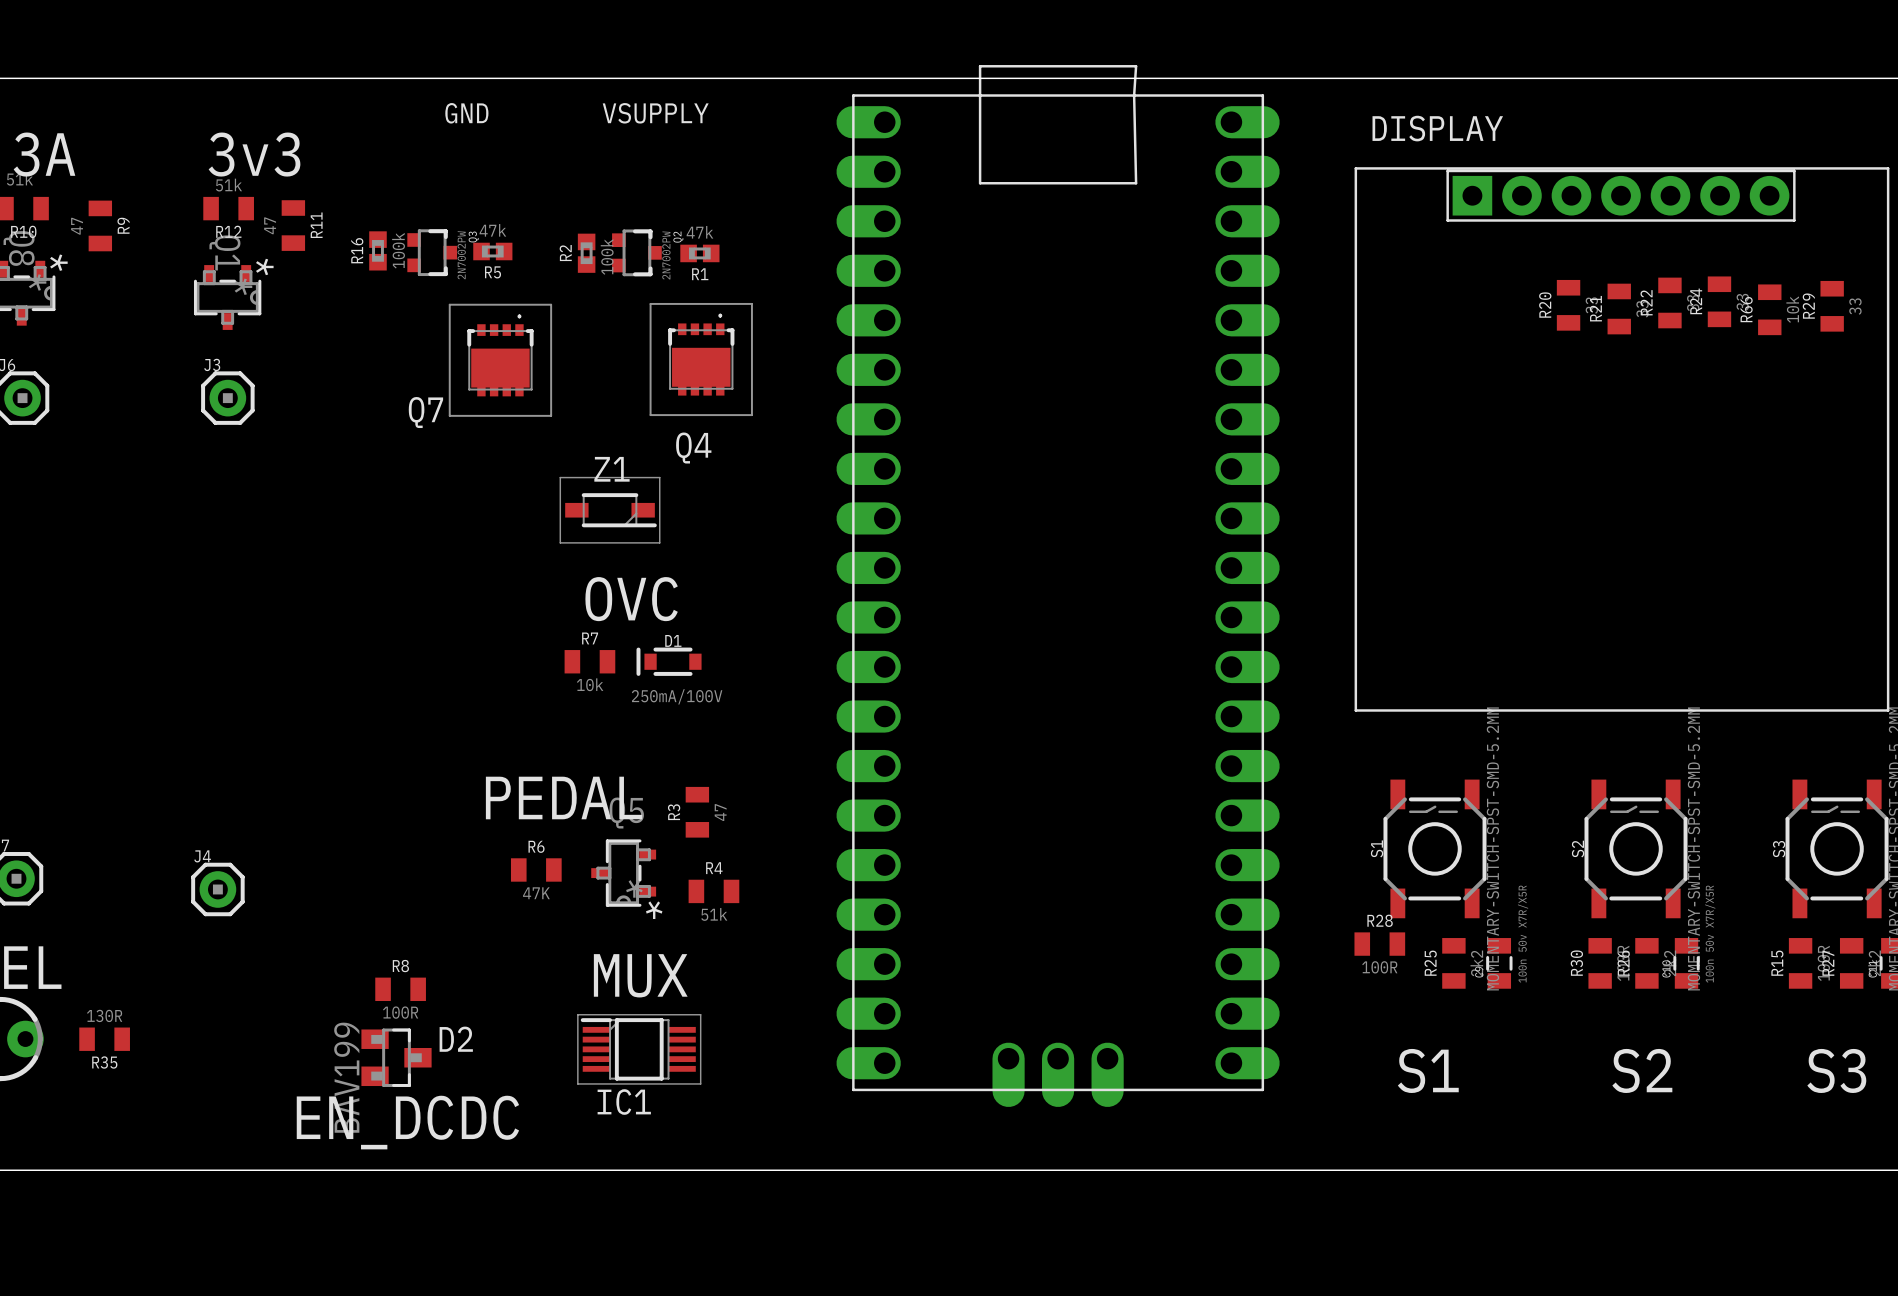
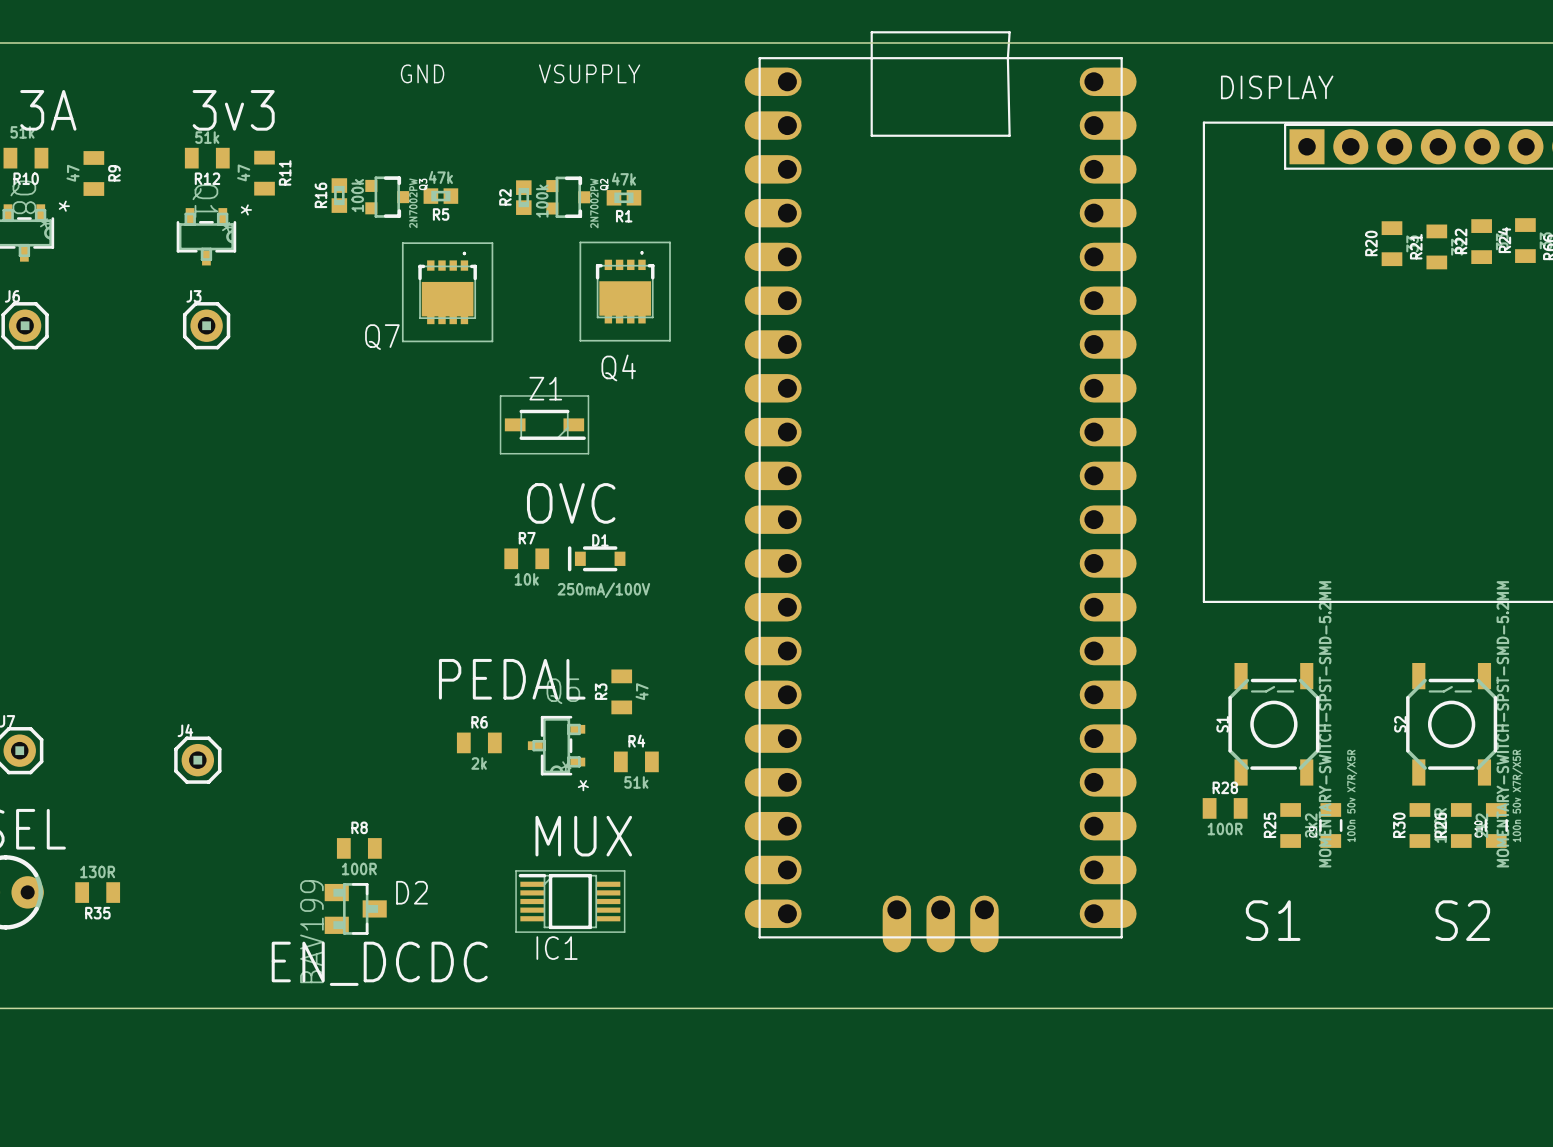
R6 value: 47K (536, 893) -> 2k (479, 763)

